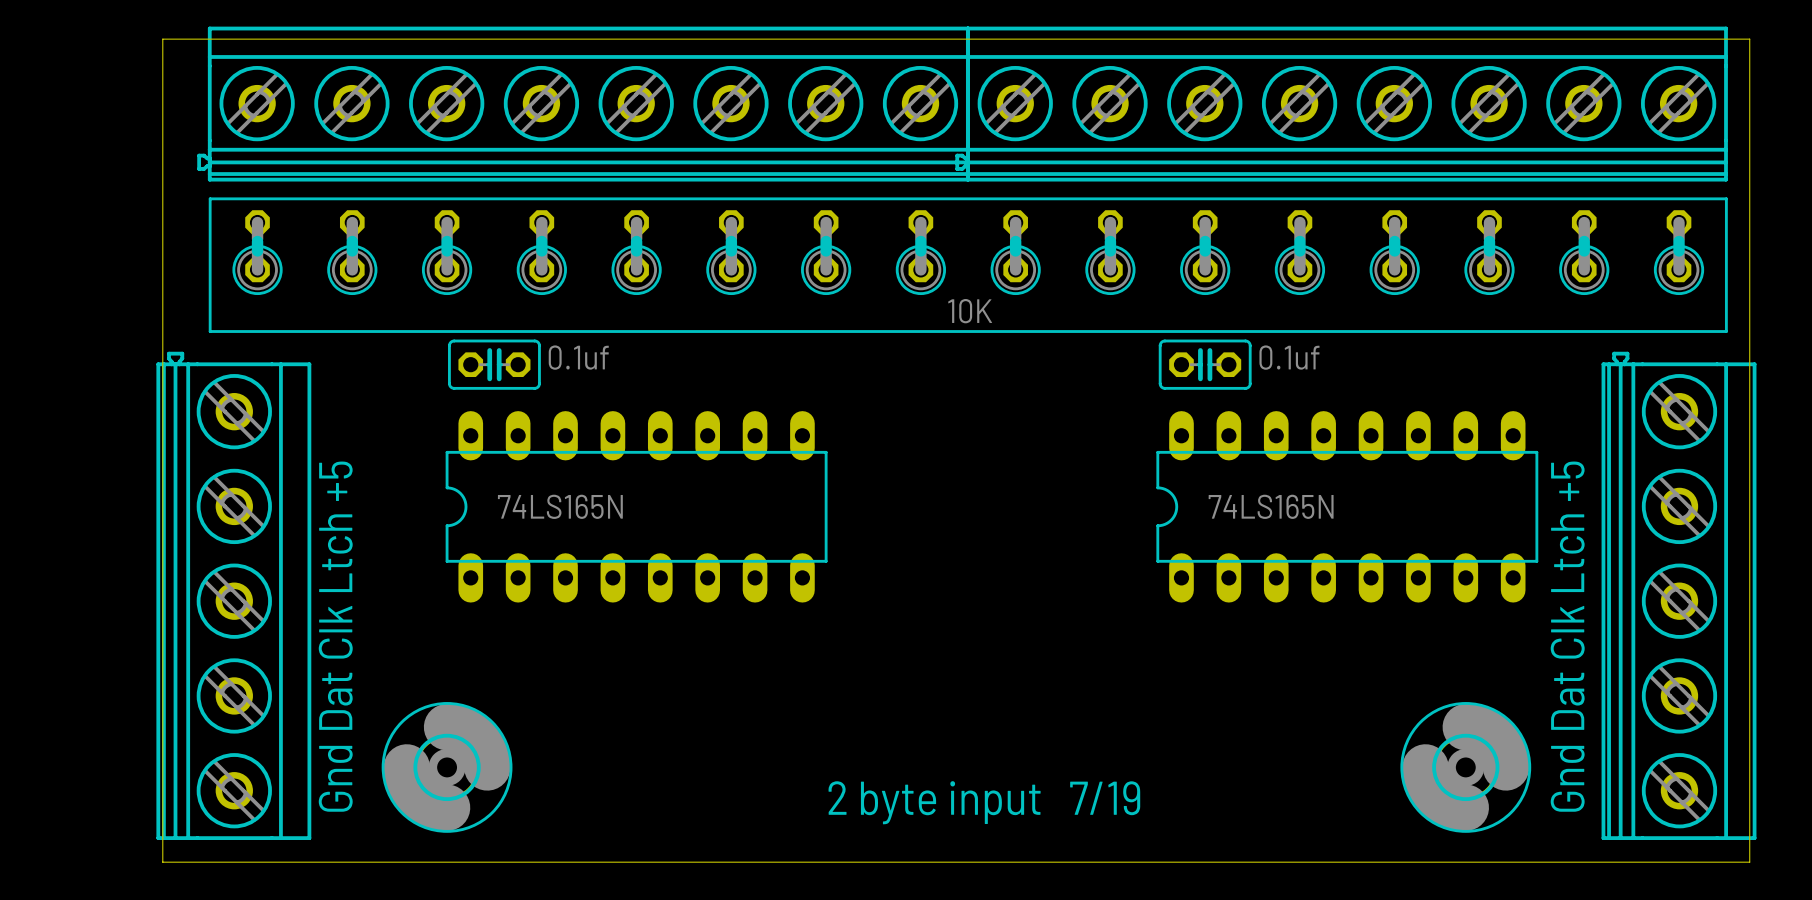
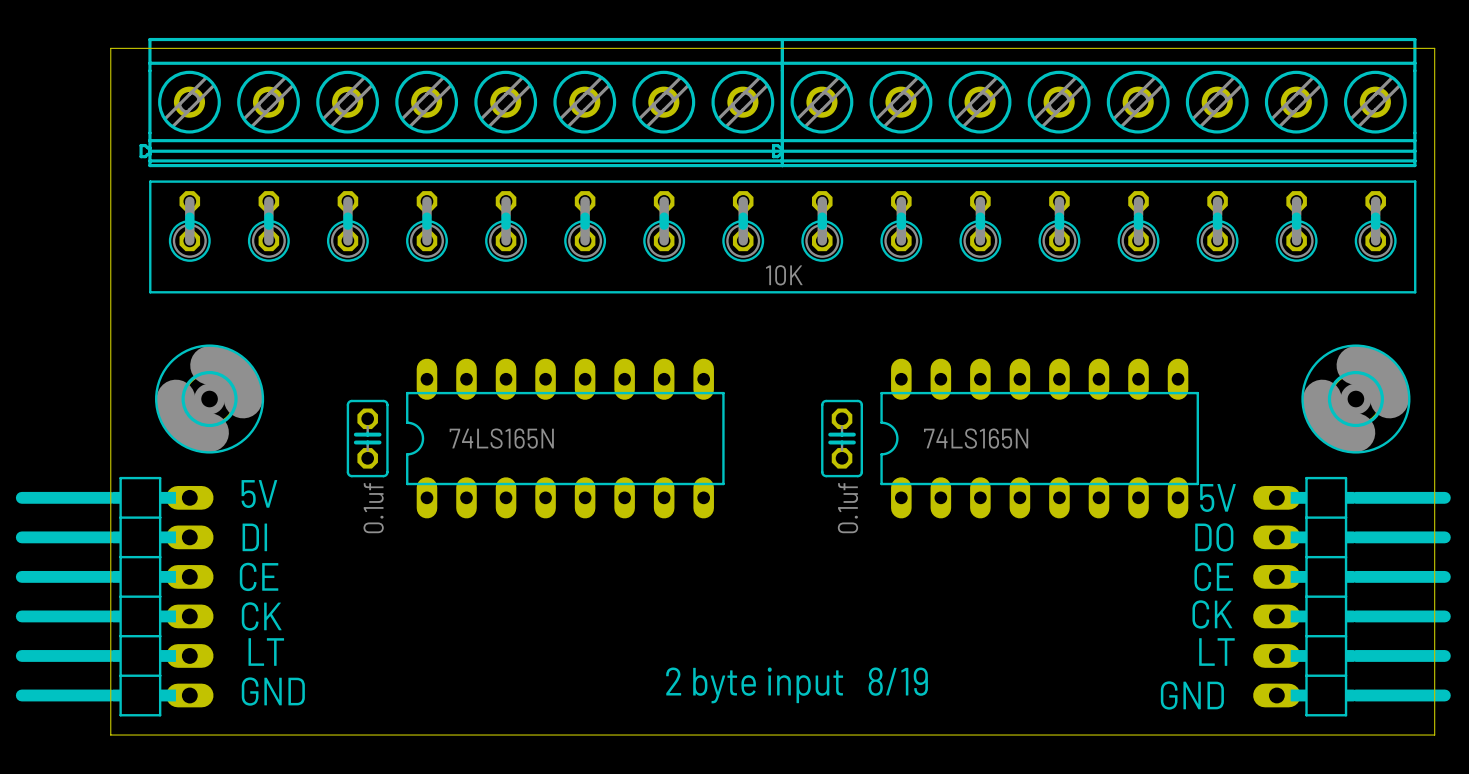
part rotation: 0° (494, 364) -> 90° clockwise (367, 438)
part position: (494, 364) -> (367, 438)
part rotation: 0° (1205, 364) -> 90° clockwise (842, 438)
part position: (1205, 364) -> (842, 438)
part position: (636, 506) -> (565, 438)
part position: (1347, 506) -> (1039, 438)
text: none -> 5V (259, 494)
text: none -> 5V (1218, 497)
part: (233, 595) -> none
part: (1679, 595) -> none
text: none -> DI (254, 537)
text: none -> DO (1214, 537)
text: Gnd Dat Clk Ltch +5 (335, 636) -> none
text: Gnd Dat Clk Ltch +5 (1567, 636) -> none
text: none -> CE (259, 576)
text: none -> CE (1213, 576)
part: none -> (114, 596)
part: none -> (1351, 596)
text: none -> CK (1212, 614)
text: none -> CK (261, 616)
text: none -> LT (266, 652)
text: none -> LT (1216, 652)
part position: (447, 767) -> (209, 399)
part position: (1465, 767) -> (1355, 399)
text: 2 byte input 7/19 (984, 802) -> 2 byte input 8/19 (797, 685)
text: none -> GND (273, 691)
text: none -> GND (1192, 695)

